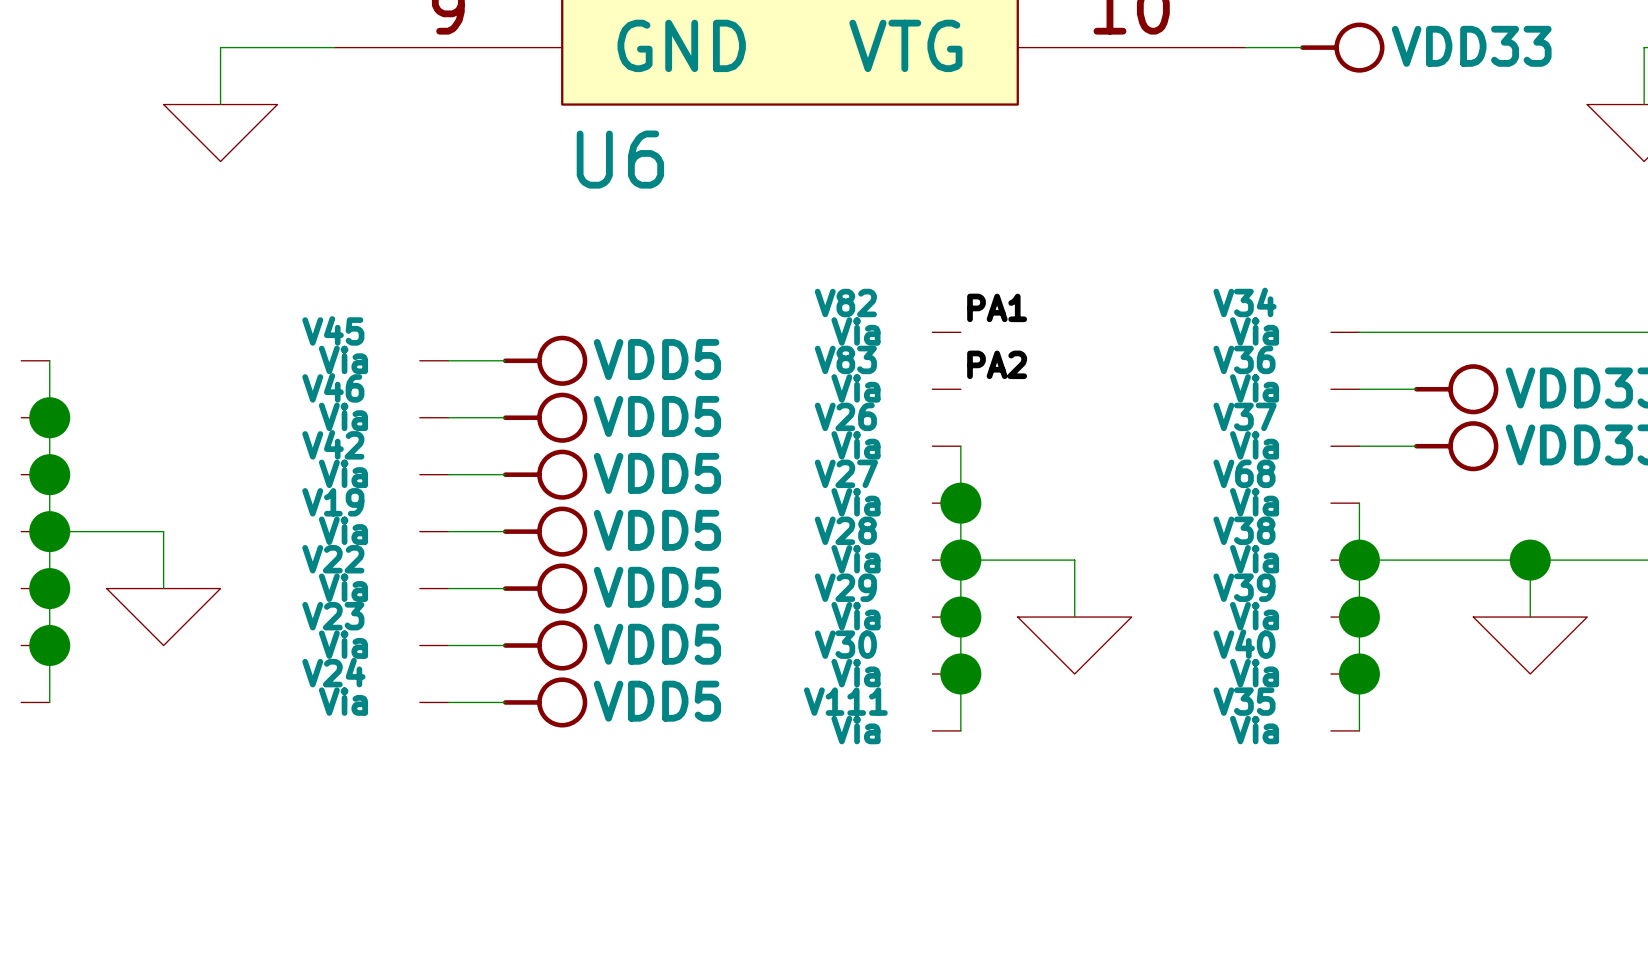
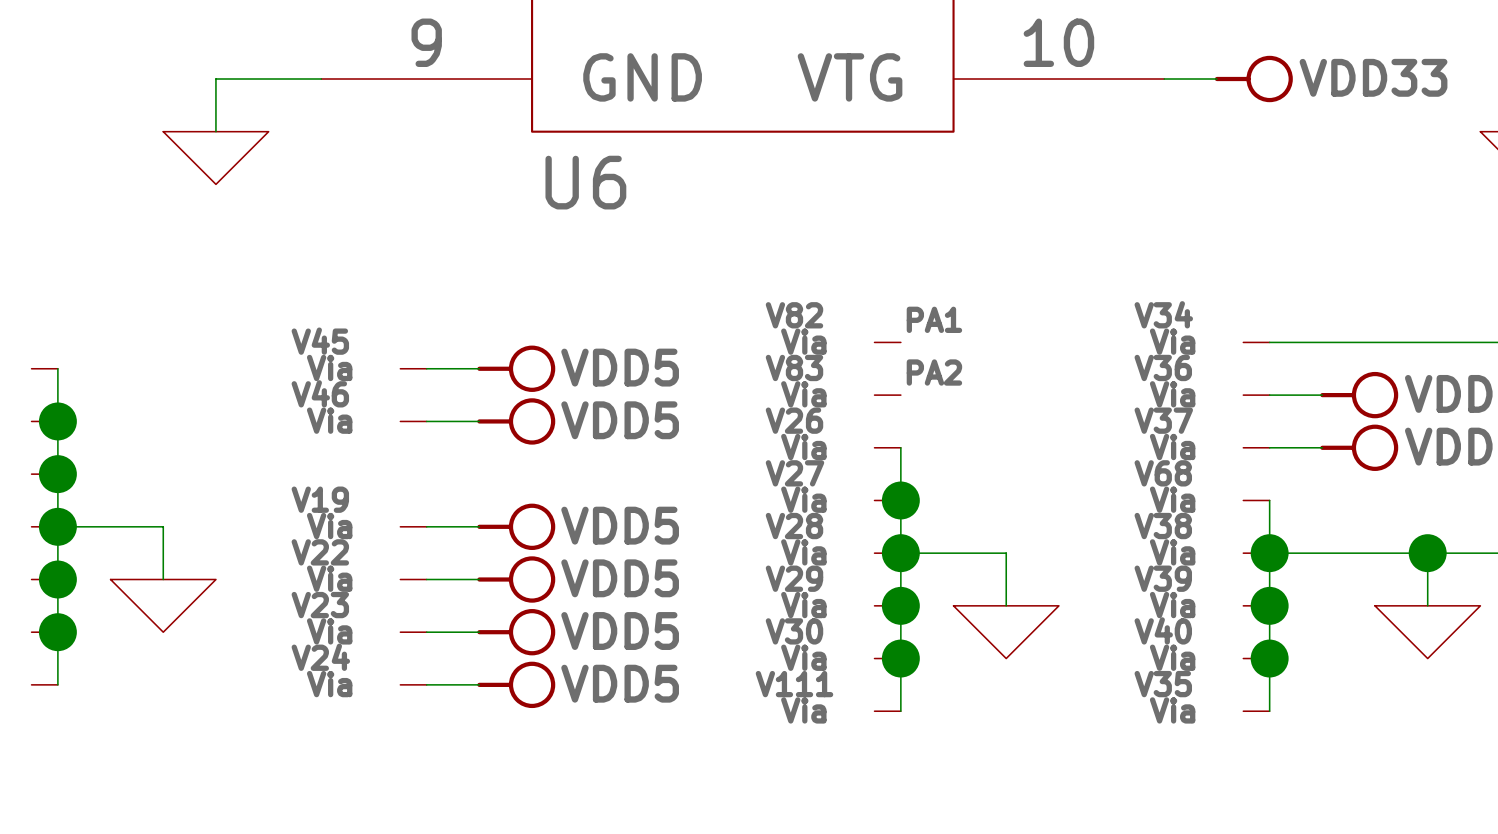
V42: (434, 474) -> none
wire: (448, 474) (505, 474) -> none
power symbol: VDD5 (545, 474) -> none

